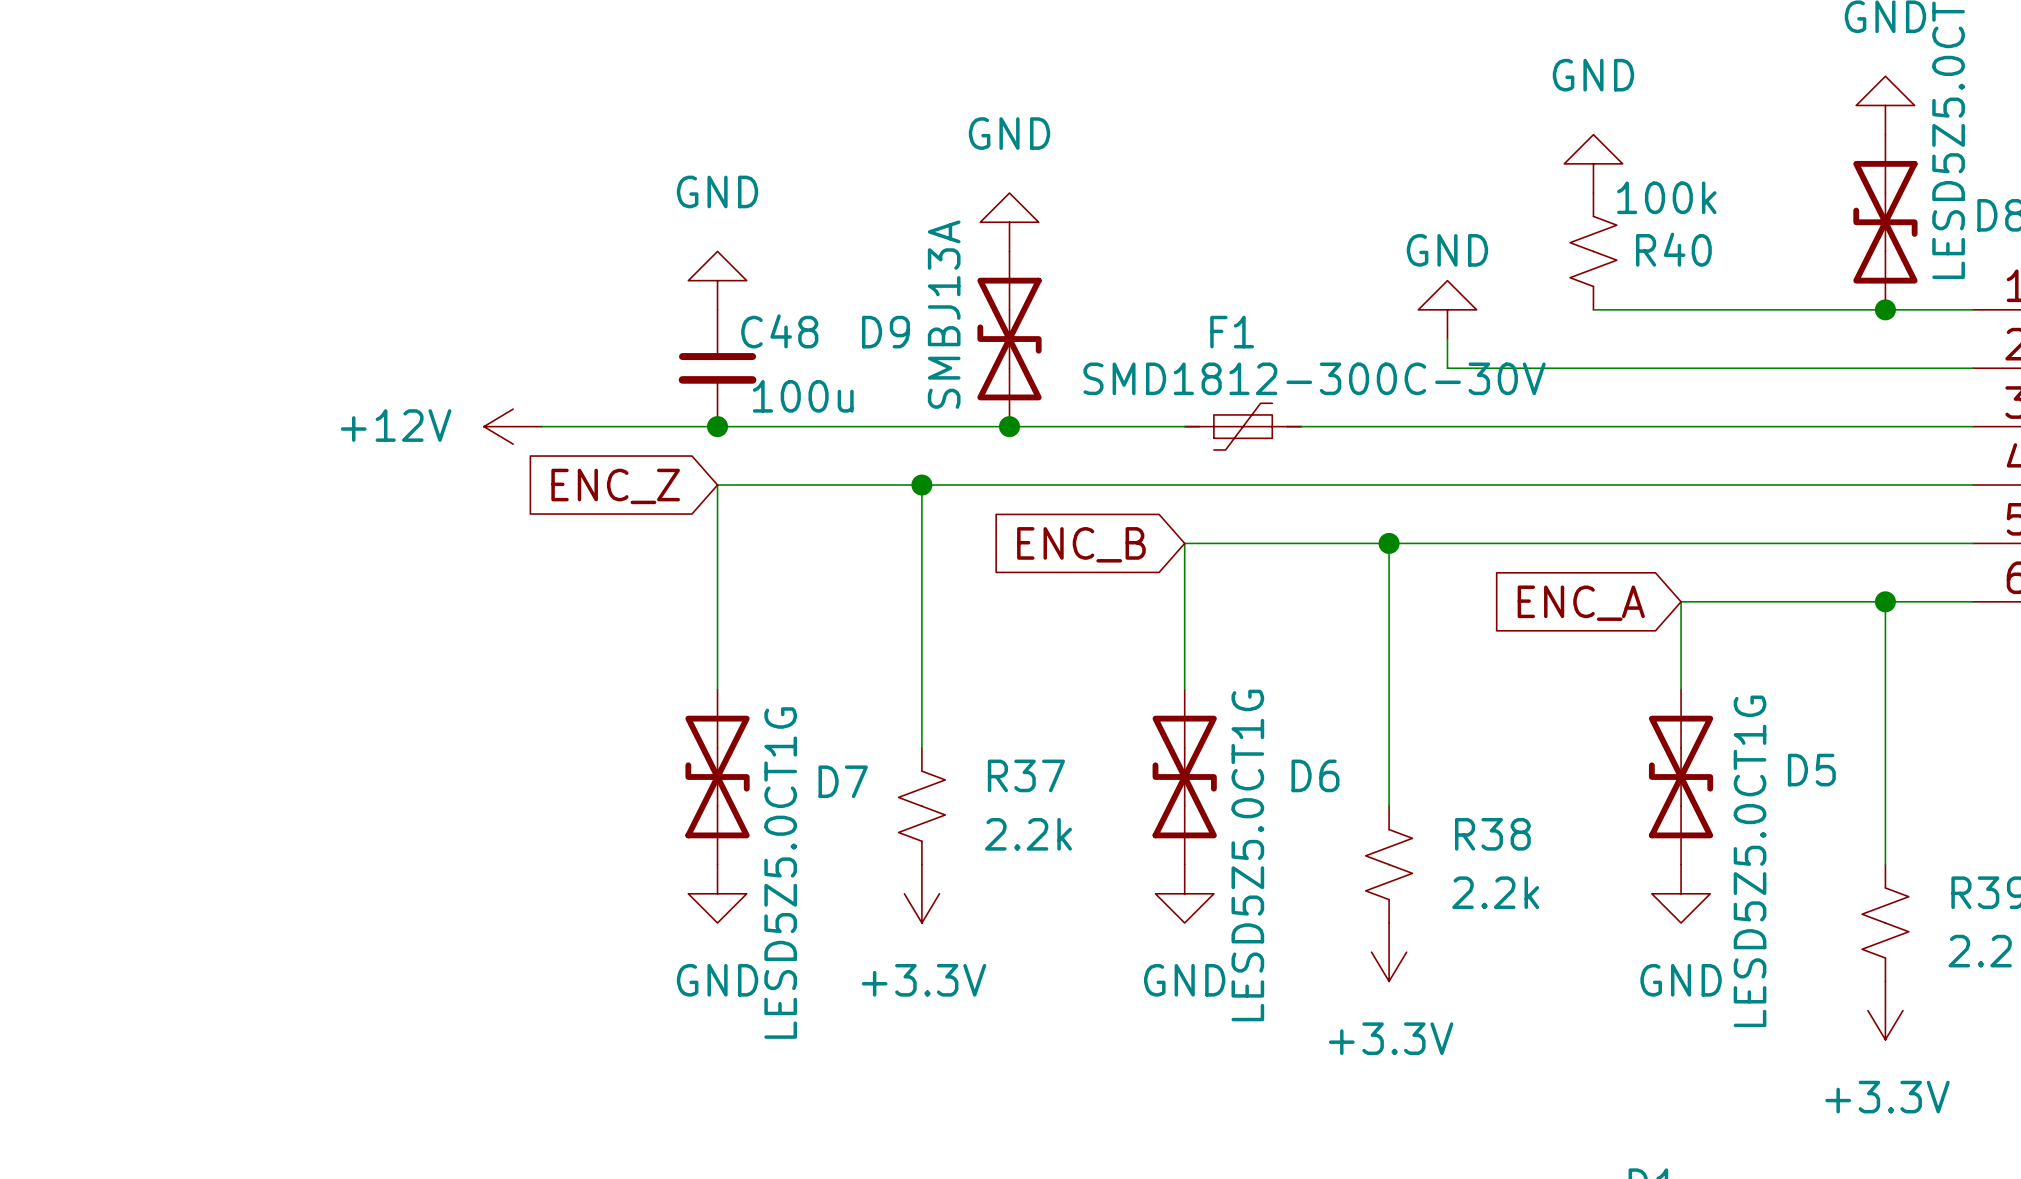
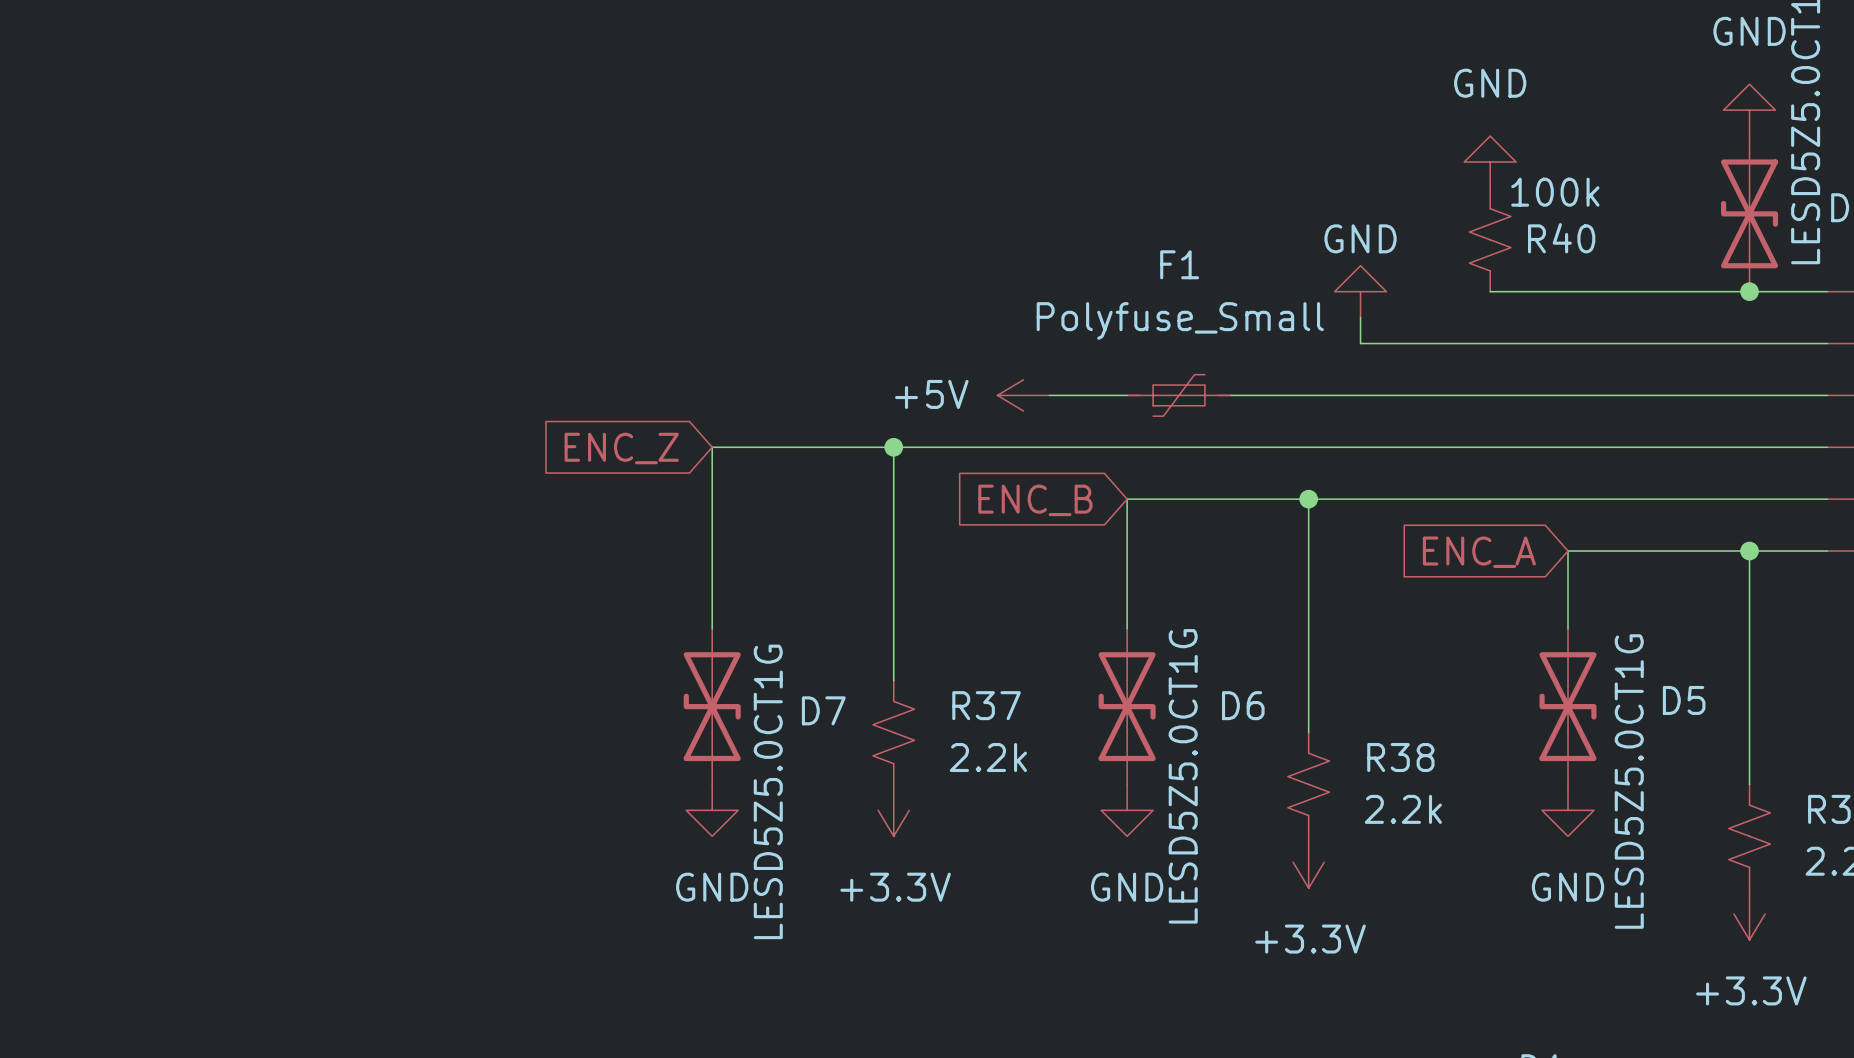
power symbol: GND (1009, 222) -> none
power symbol: GND (717, 280) -> none
F1 name position: F1 (1232, 332) -> F1 (1179, 264)
D9: SMBJ13A (1009, 339) -> none
C48: 100u (717, 368) -> none
F1 value: SMD1812-300C-30V (1314, 378) -> Polyfuse_Small (1180, 320)
power symbol: +12V (513, 426) -> none
wire: (542, 426) (1097, 426) -> none
junction: (717, 426) -> none
junction: (1009, 426) -> none
power symbol: none -> +5V (1023, 395)

